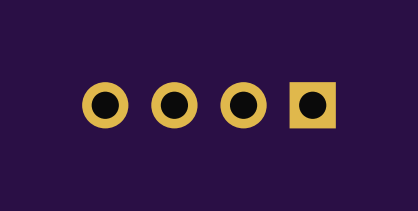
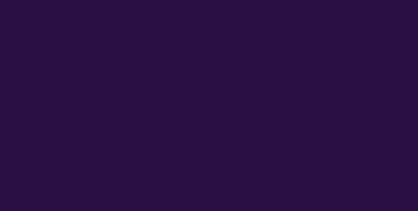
part: (208, 105) -> none

